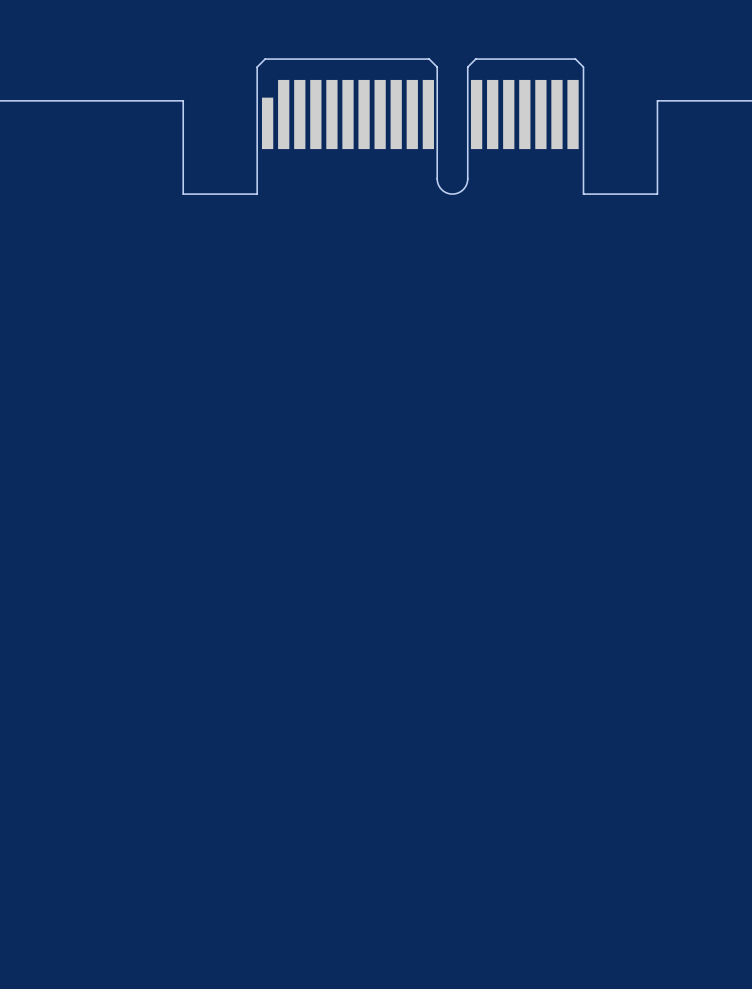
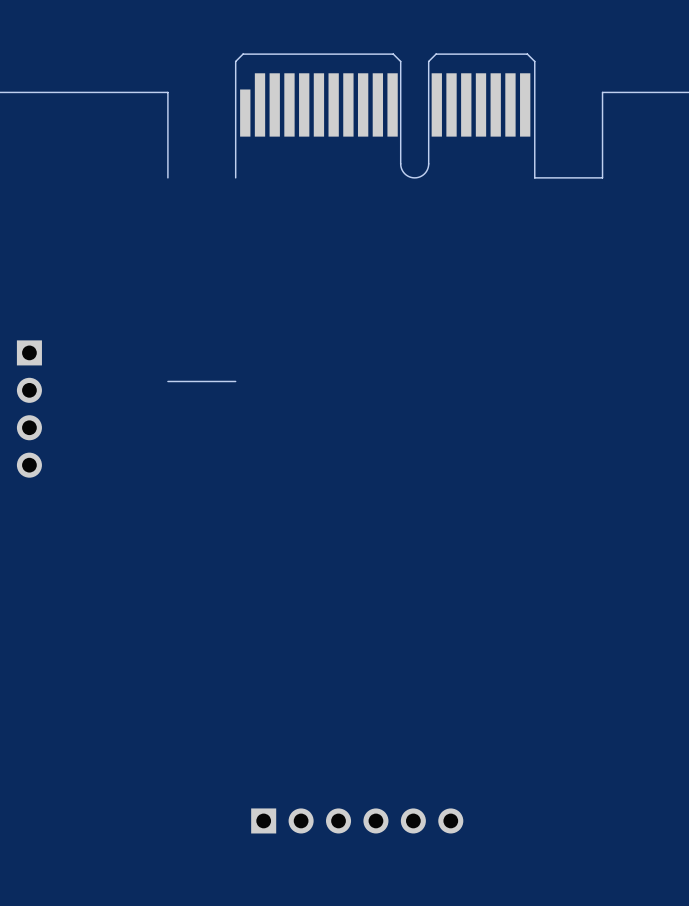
board edge: (257, 194) (183, 194) -> (235, 381) (167, 381)
part: none -> (29, 409)
part: none -> (357, 820)

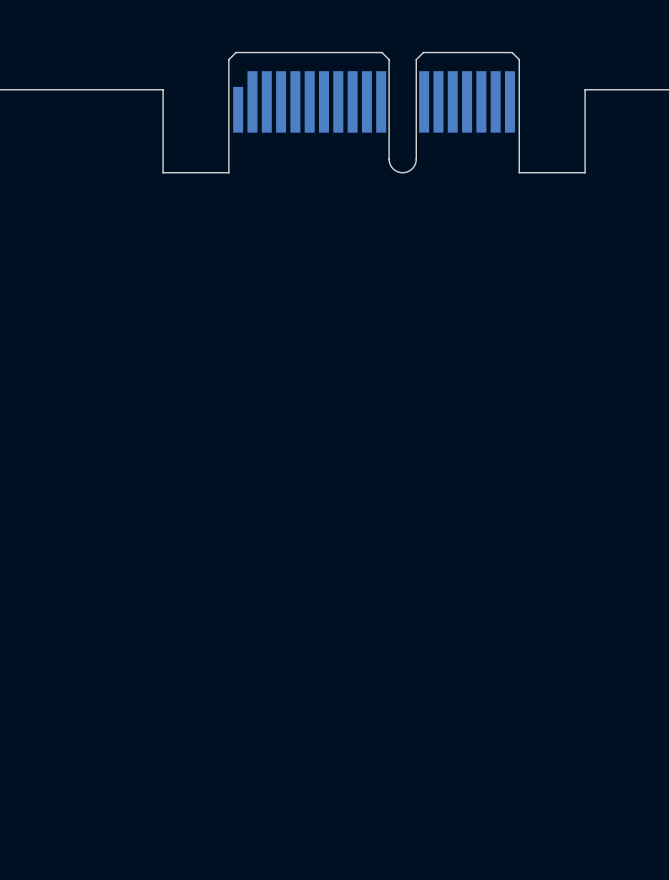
board edge: (235, 381) (167, 381) -> (228, 172) (163, 172)
part: (29, 409) -> none
part: (357, 820) -> none

